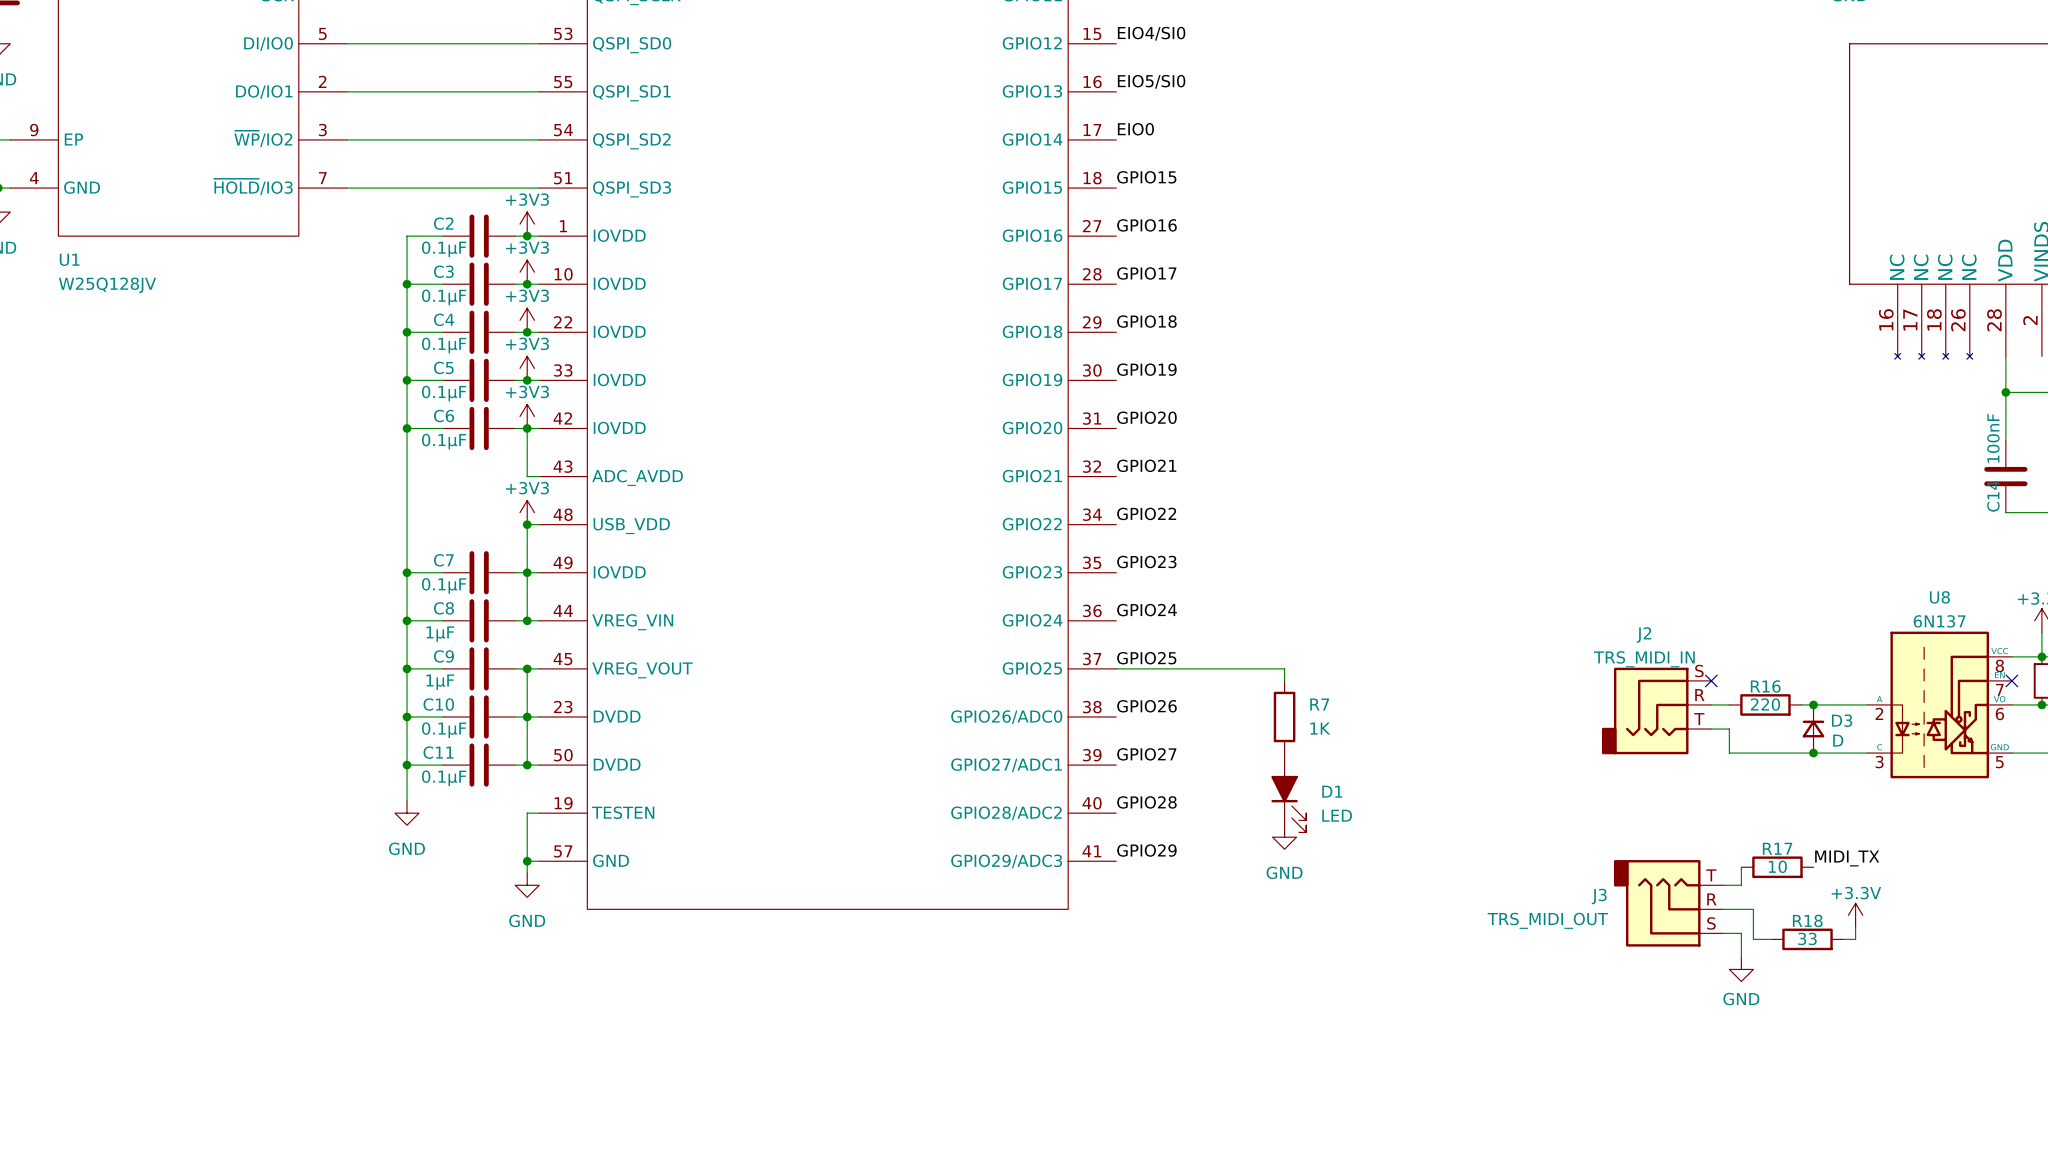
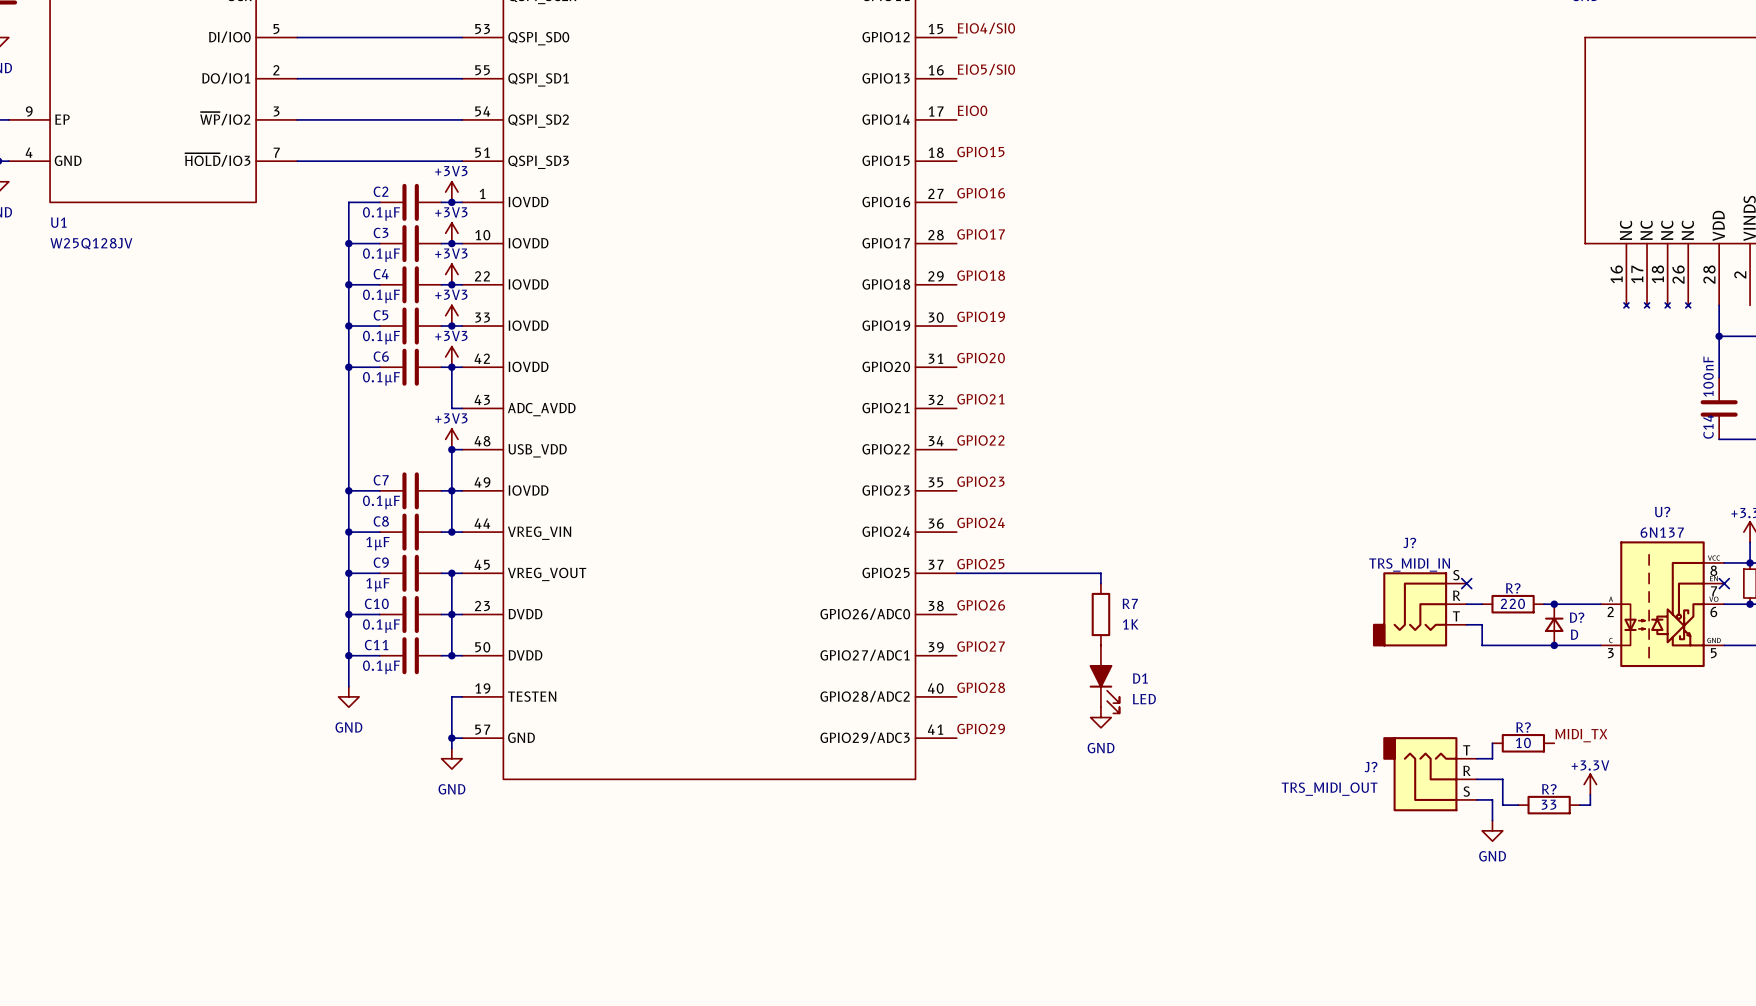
U8 name: U8 (1939, 597) -> U? (1662, 512)
J2 name: J2 (1643, 634) -> J? (1409, 542)
R16 name: R16 (1765, 686) -> R? (1513, 588)
D3 name: D3 (1842, 720) -> D? (1577, 617)
R17 name: R17 (1777, 848) -> R? (1523, 727)
J3 name: J3 (1599, 896) -> J? (1370, 767)
R18 name: R18 (1807, 920) -> R? (1549, 789)

